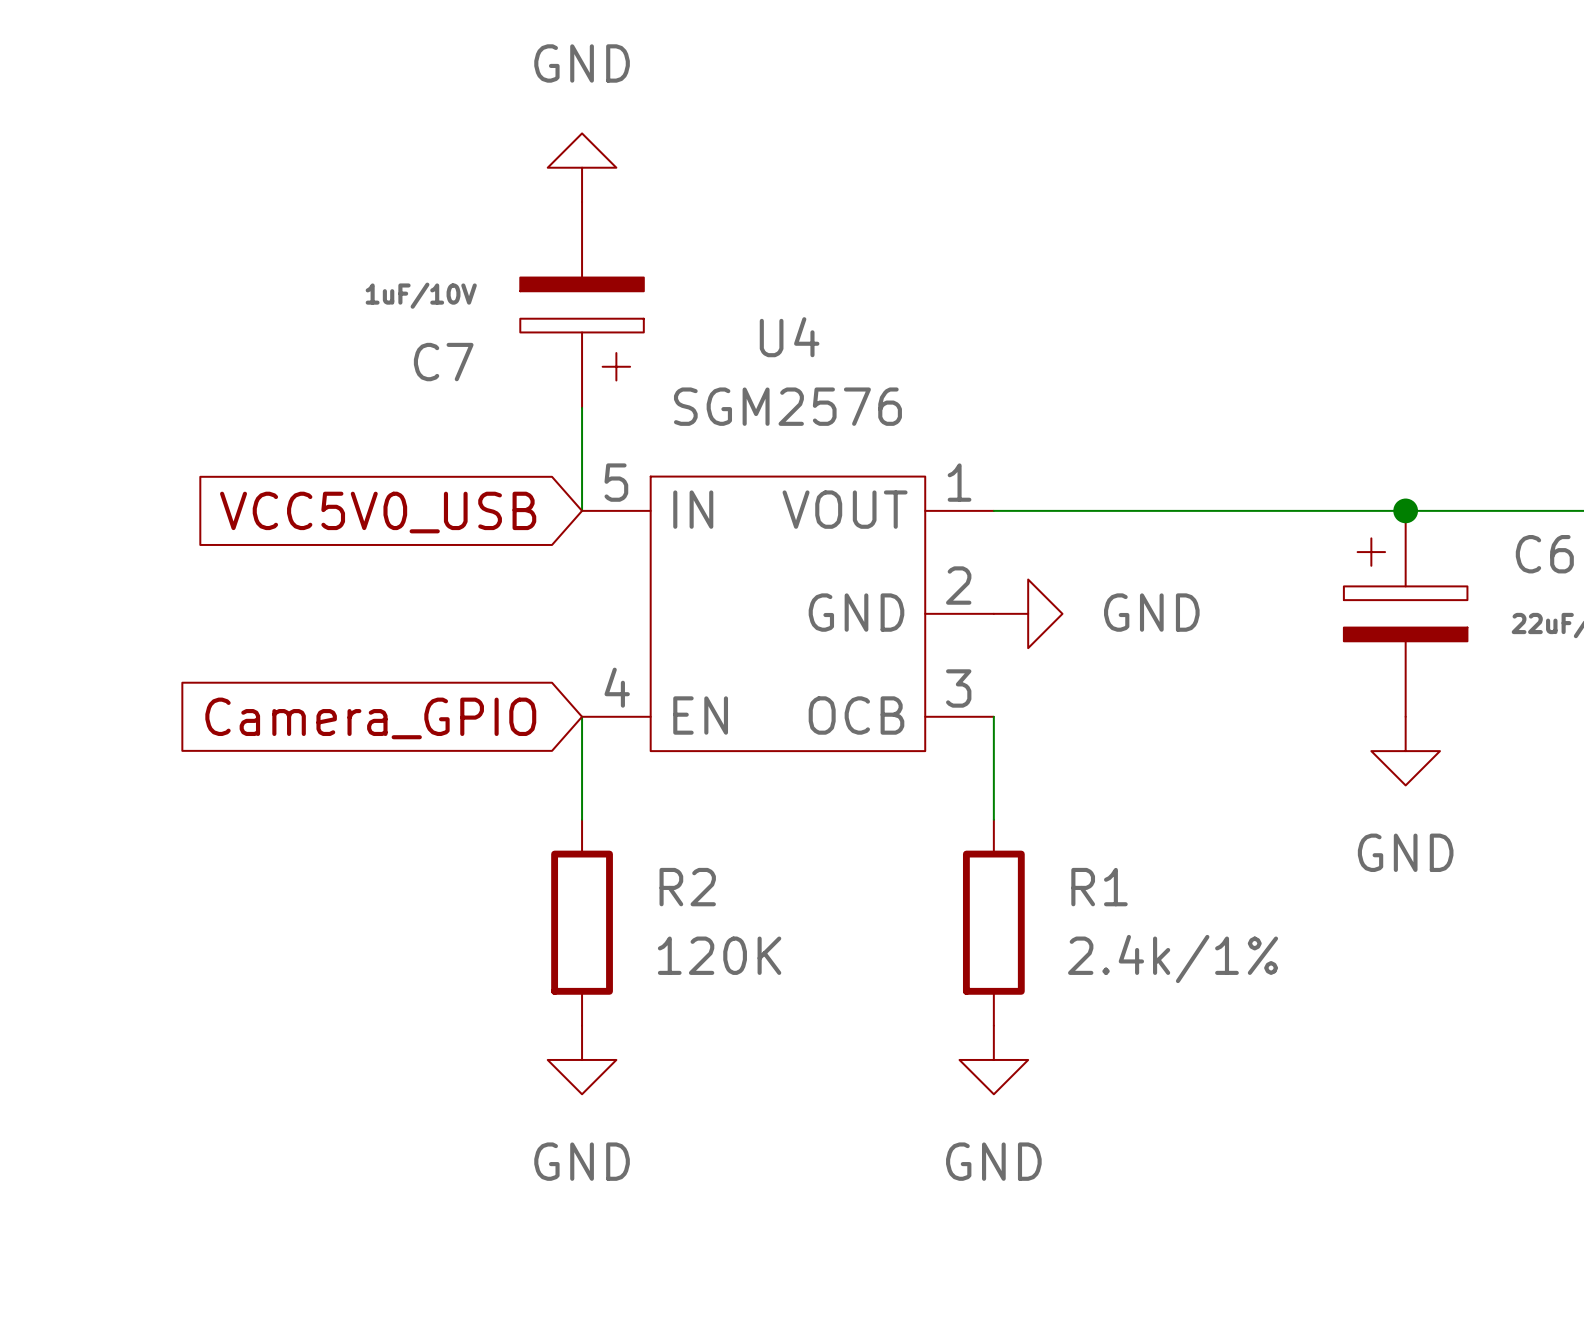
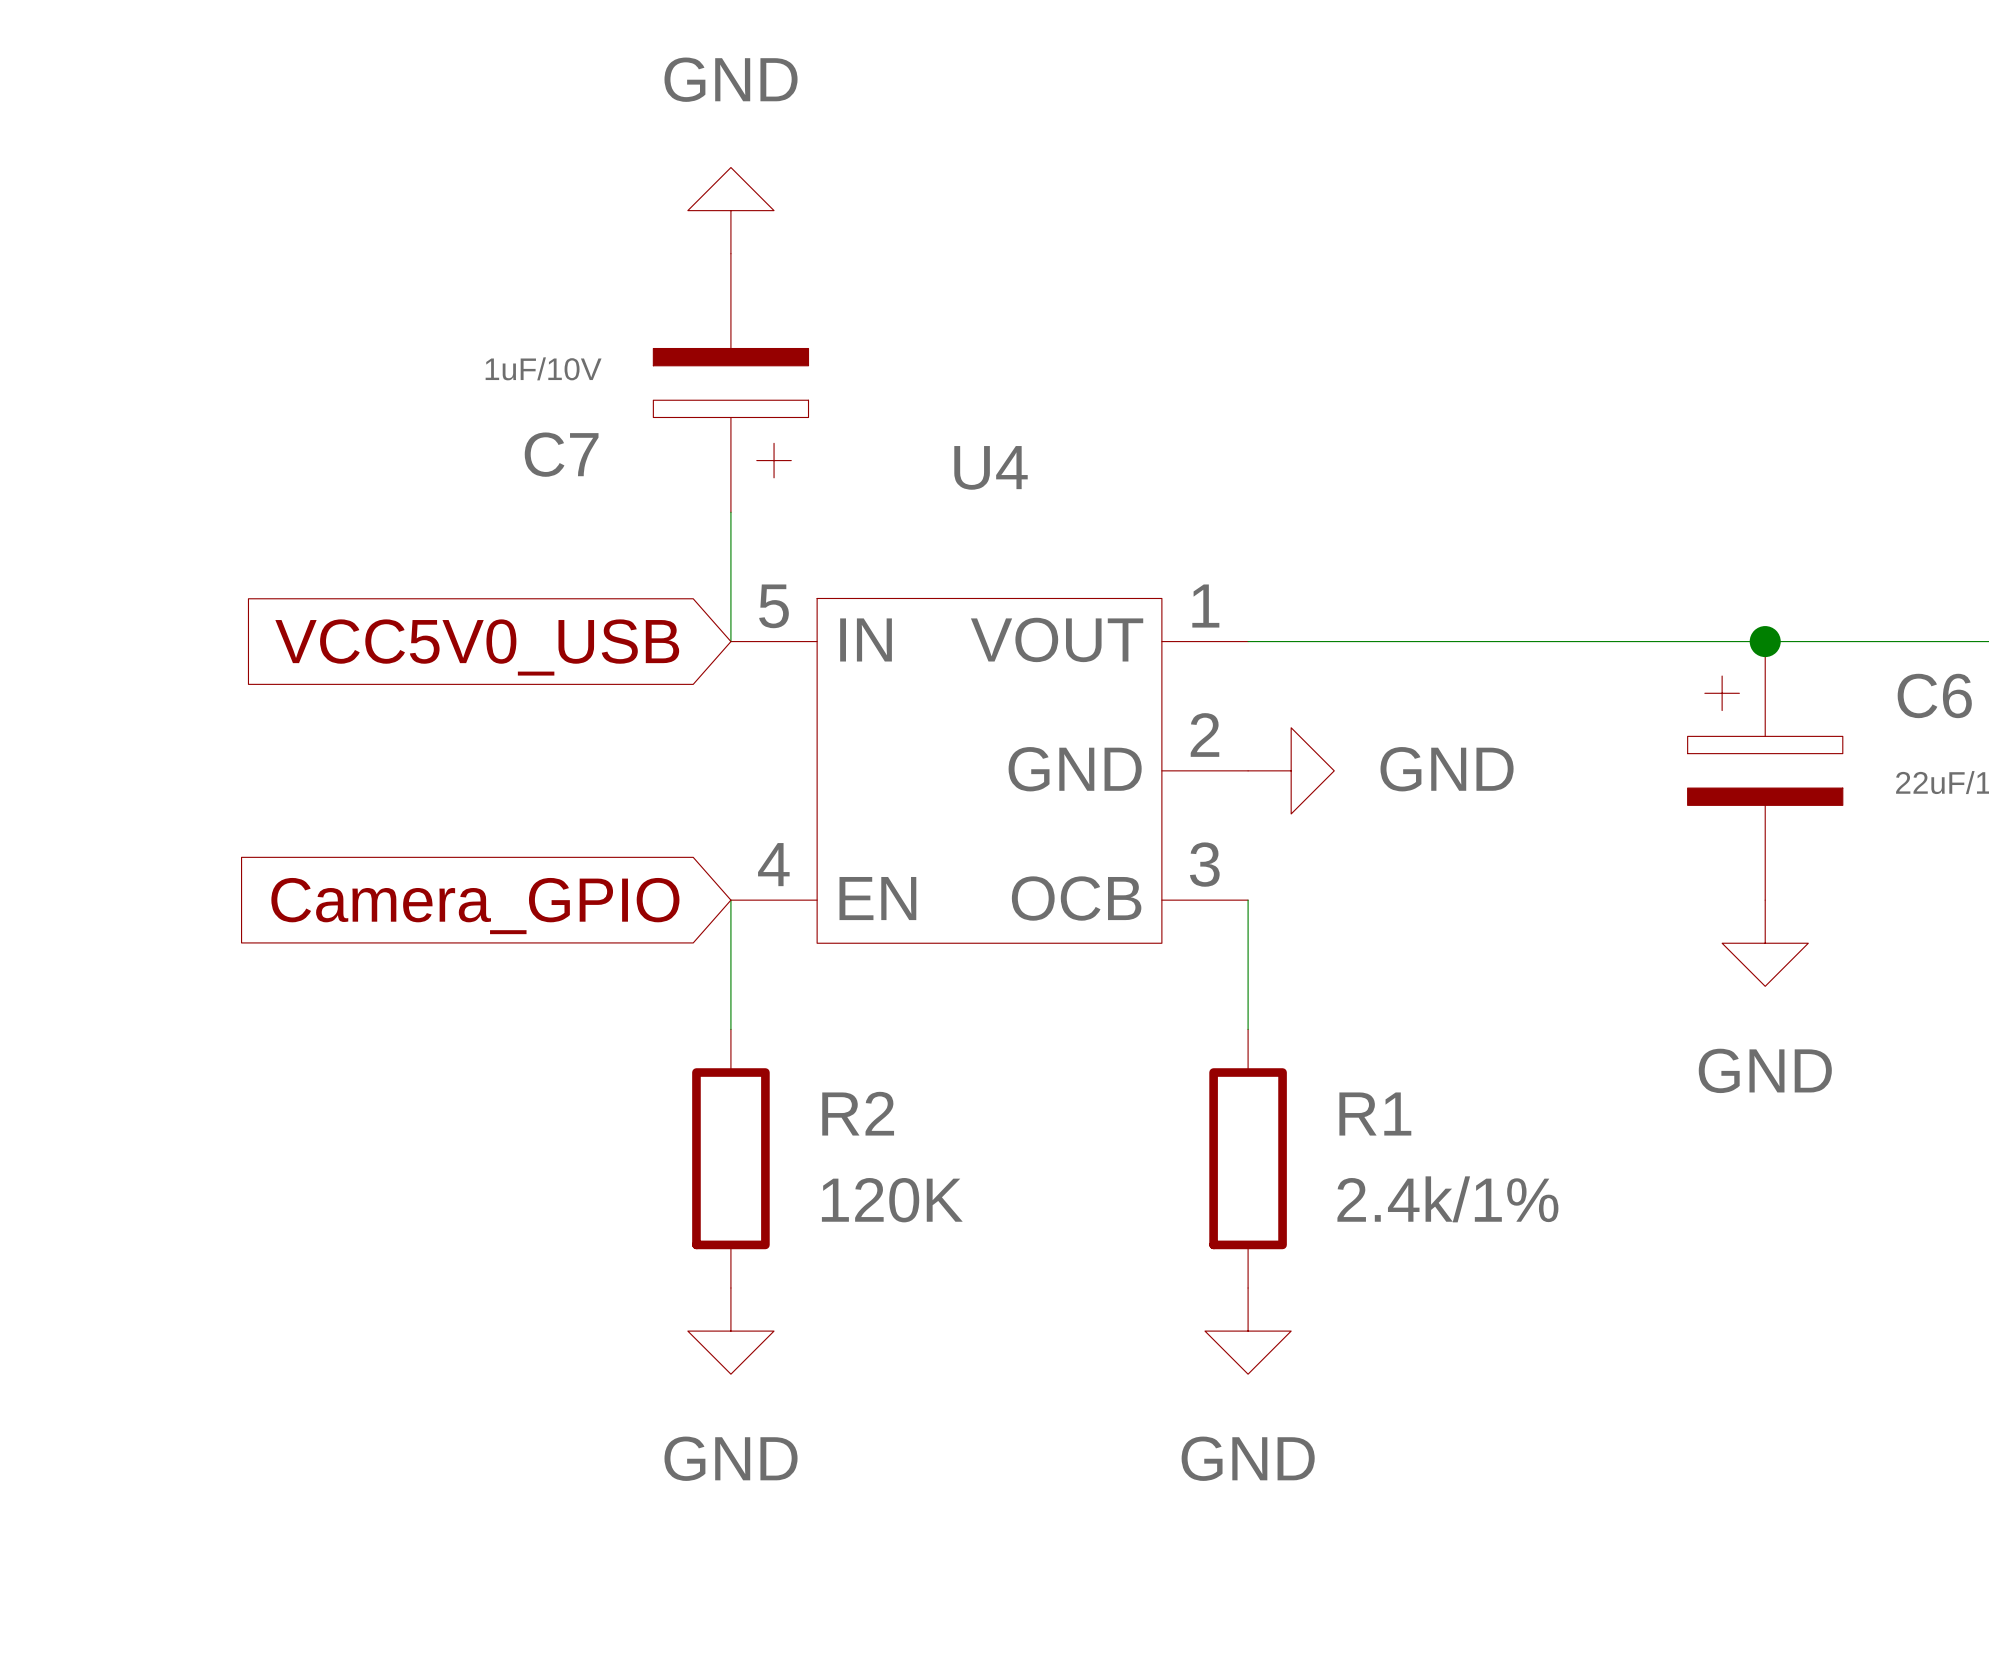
U4 name position: U4 (789, 337) -> U4 (991, 467)
U4 value: SGM2576 (787, 406) -> none

